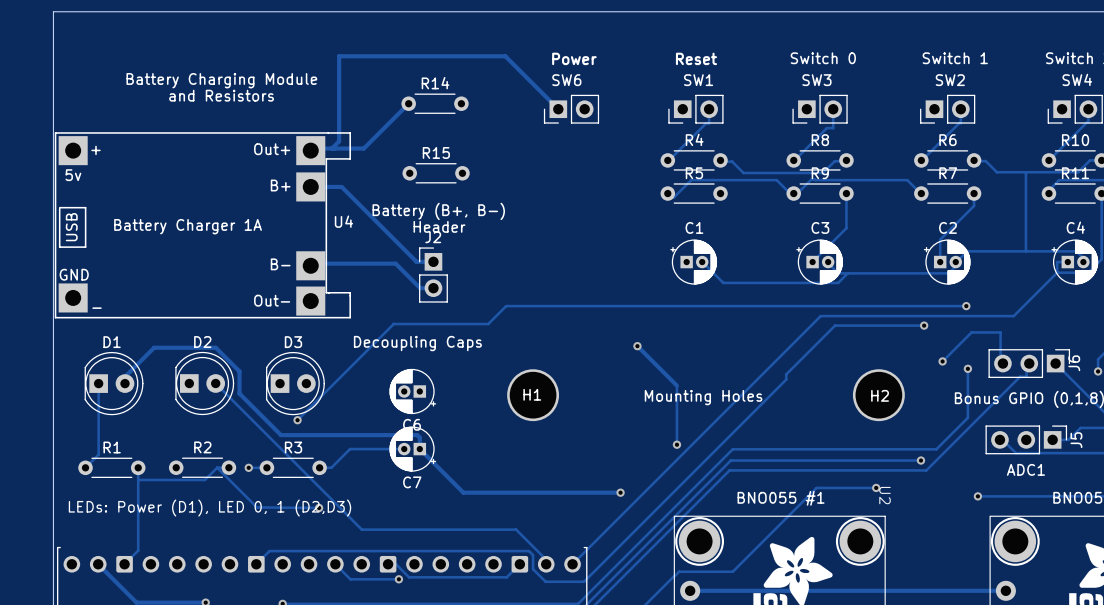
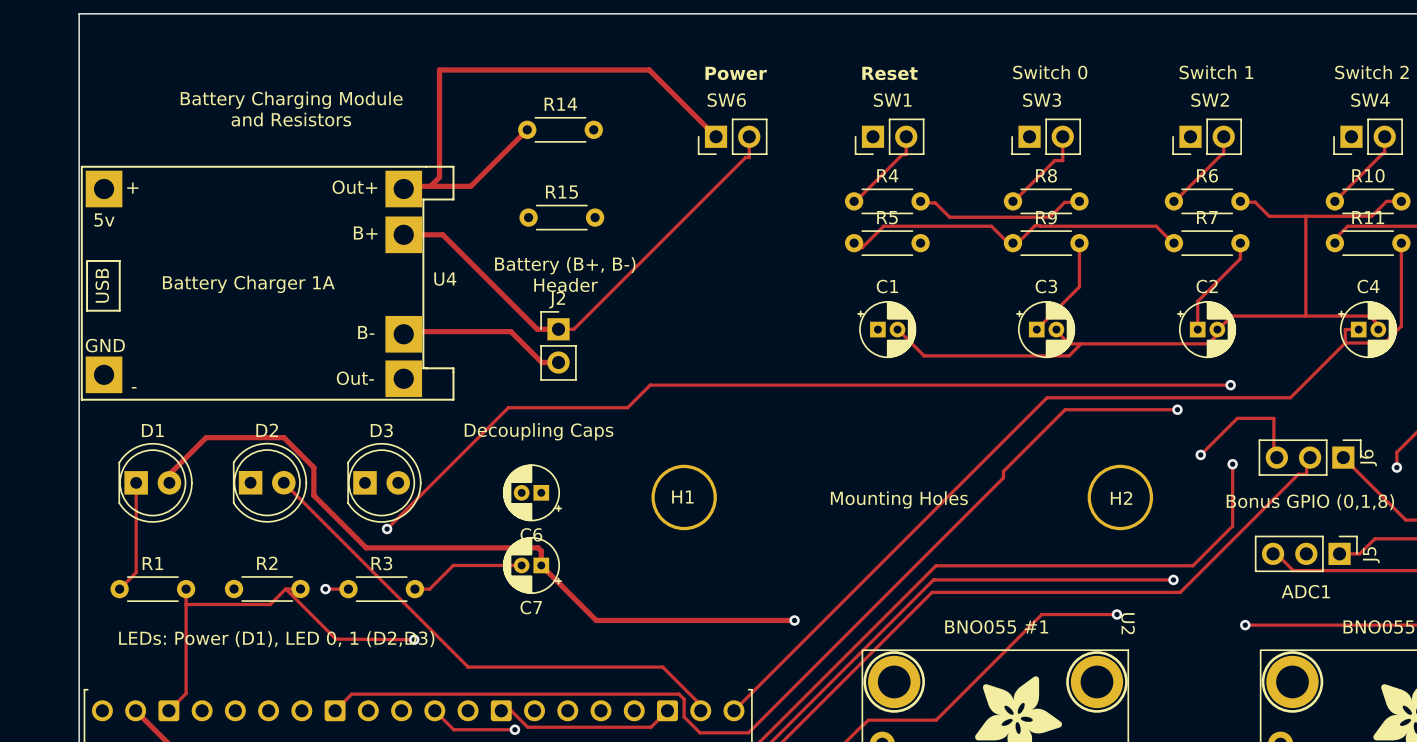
track: none -> (749, 140) (749, 157) (745, 157) (573, 329) (558, 329)
track: (637, 346) (676, 385) (676, 444) -> none
via: (637, 346) -> none
via: (676, 444) -> none

